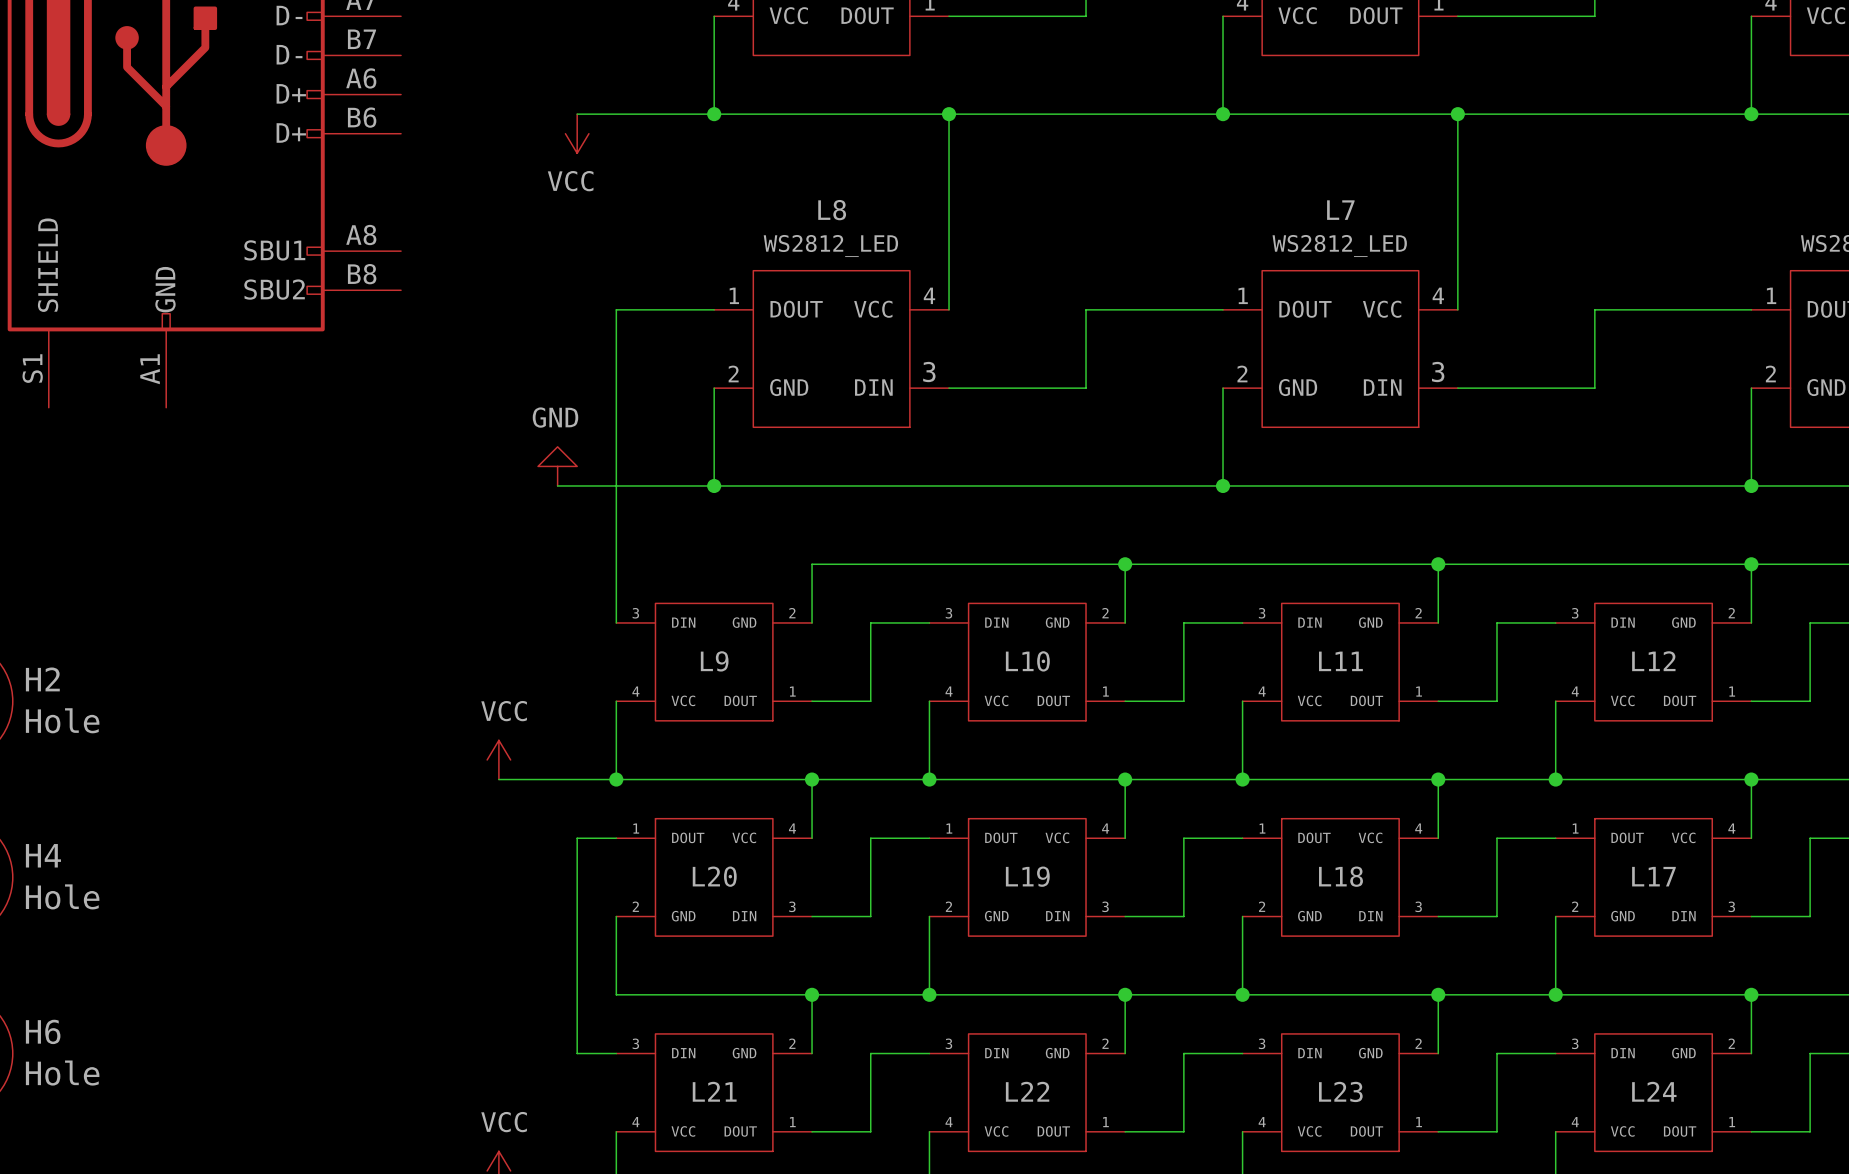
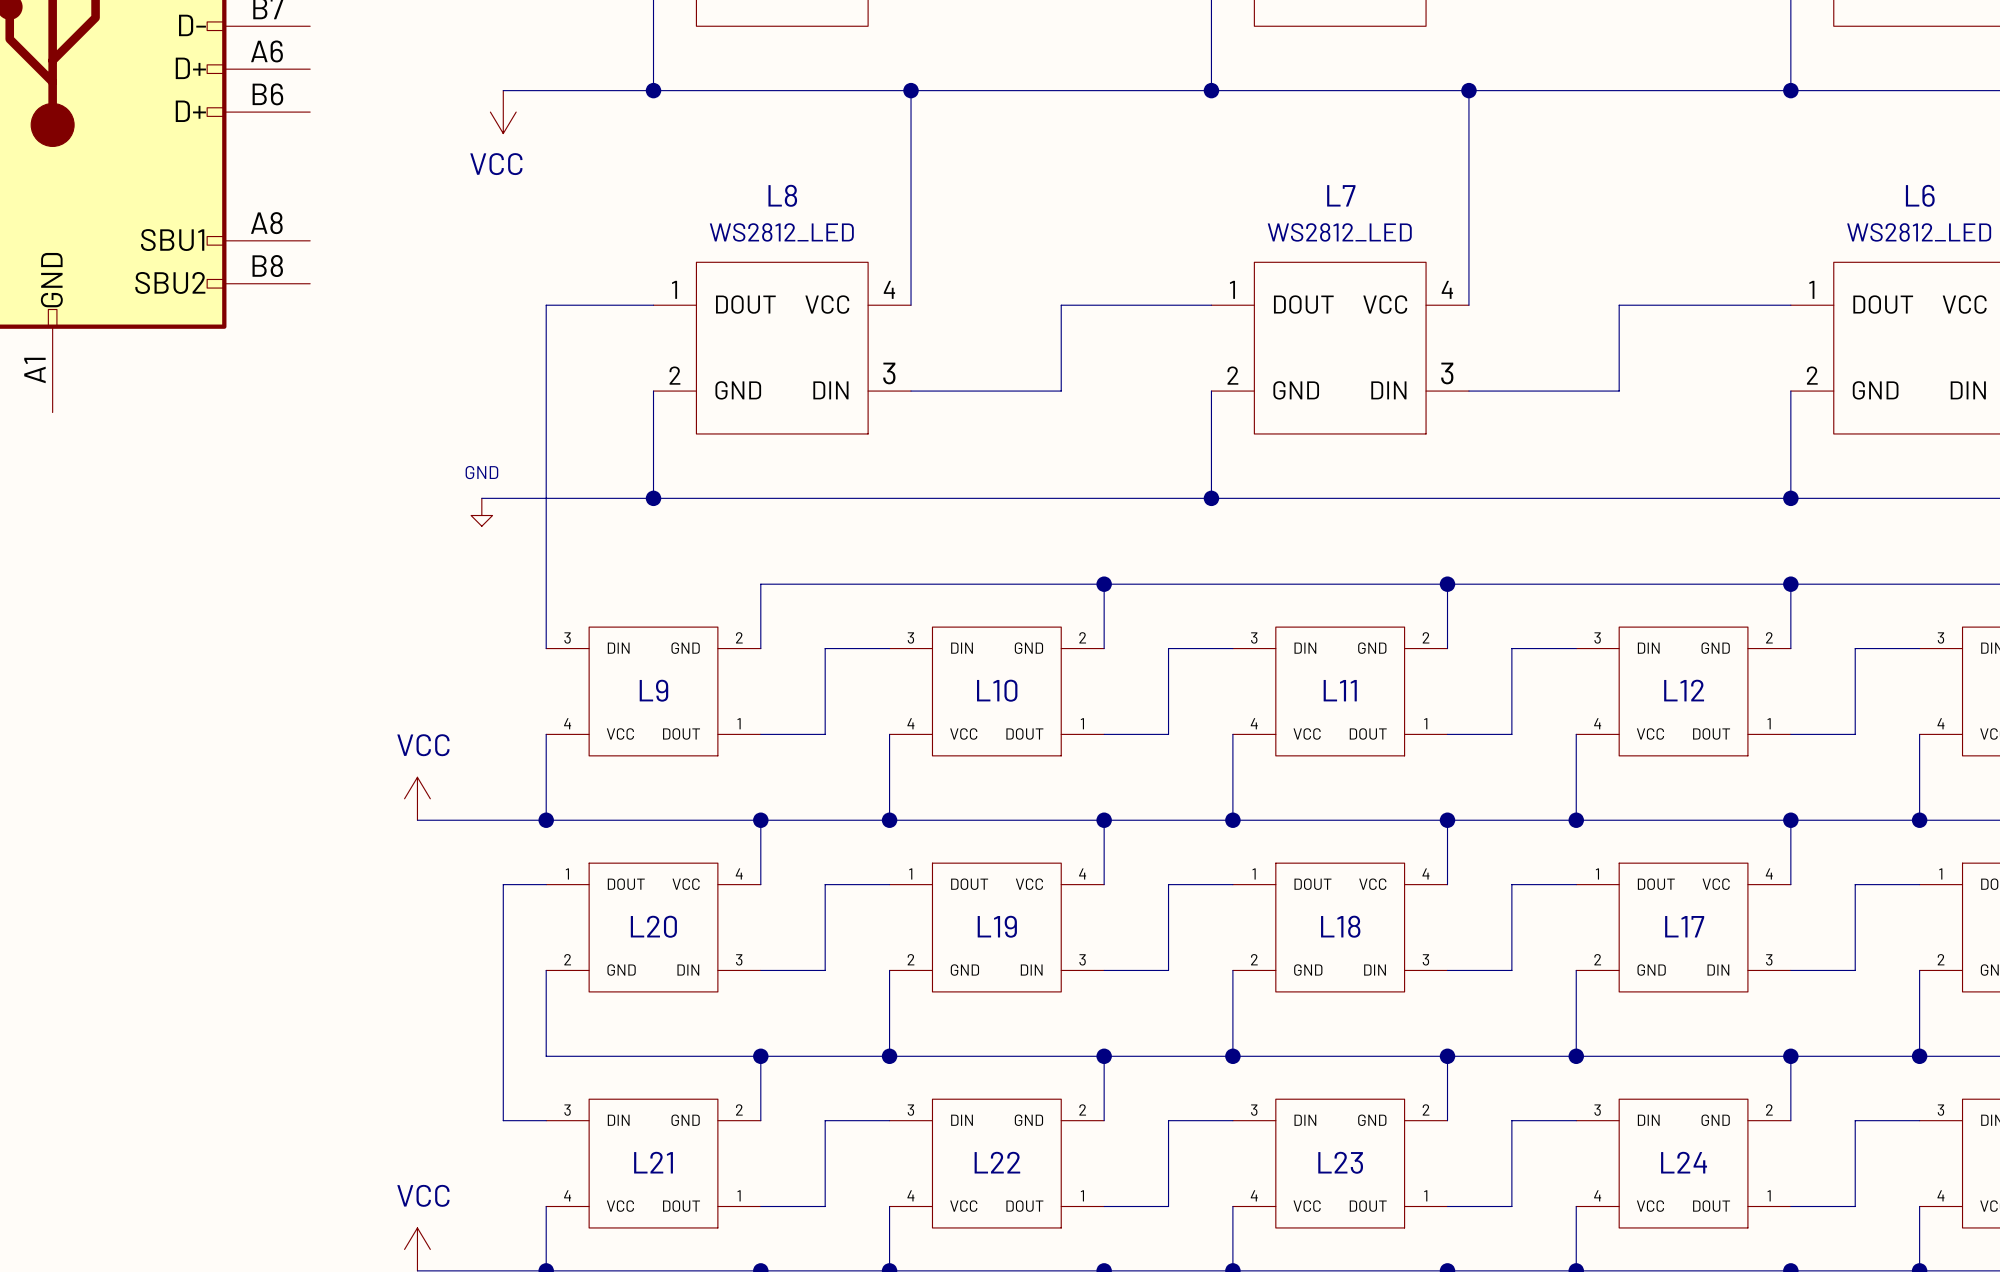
power symbol: GND (557, 466) -> none
power symbol: none -> GND (481, 512)

